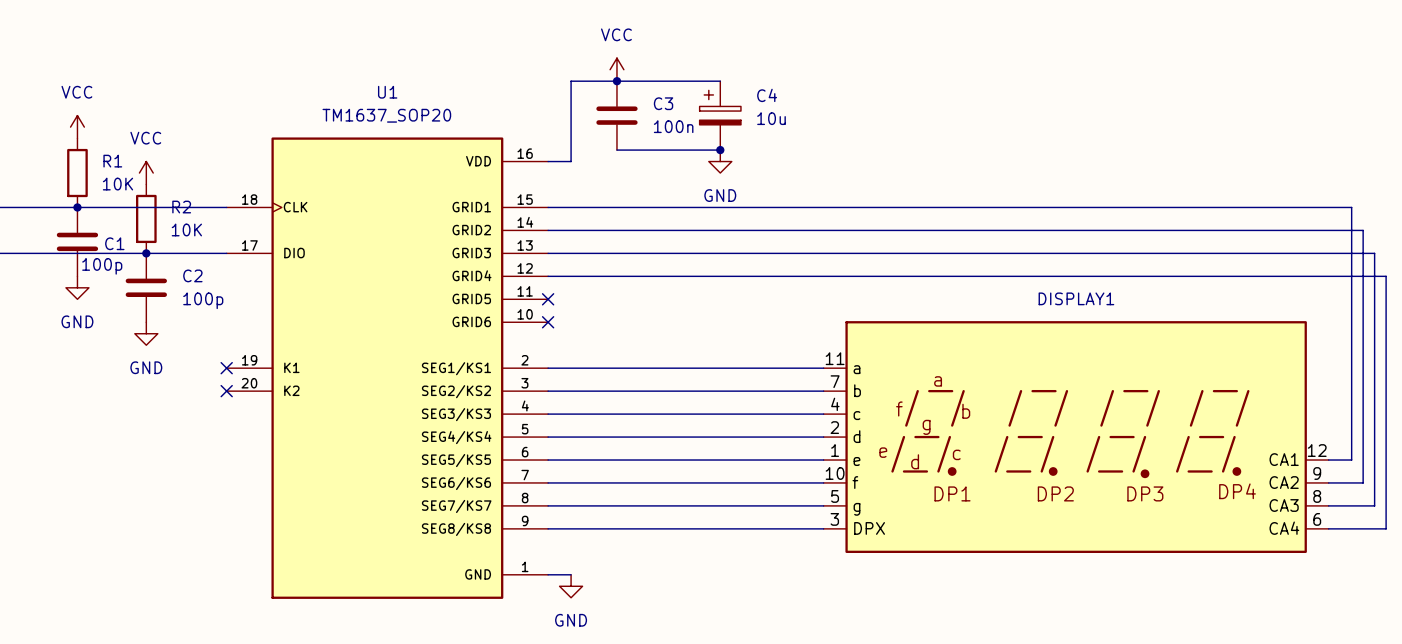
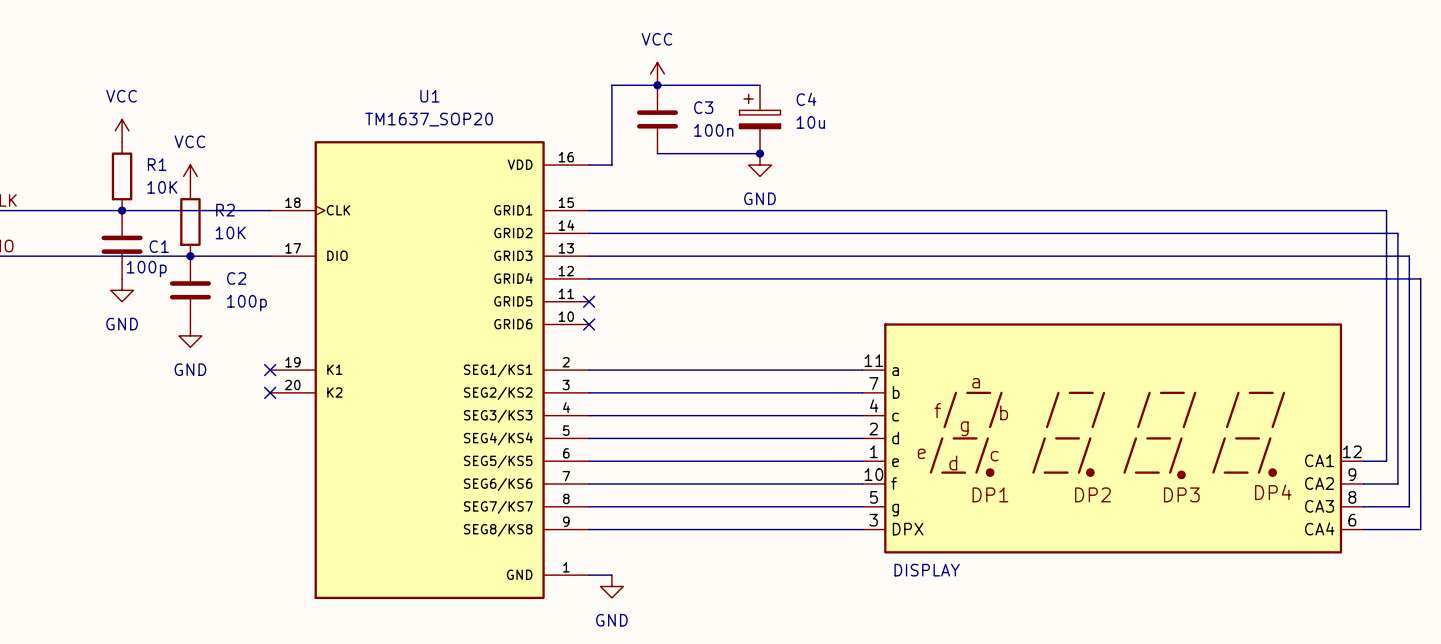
DISPLAY1 name: DISPLAY1 (1076, 298) -> none
DISPLAY1 text: none -> DISPLAY (927, 570)

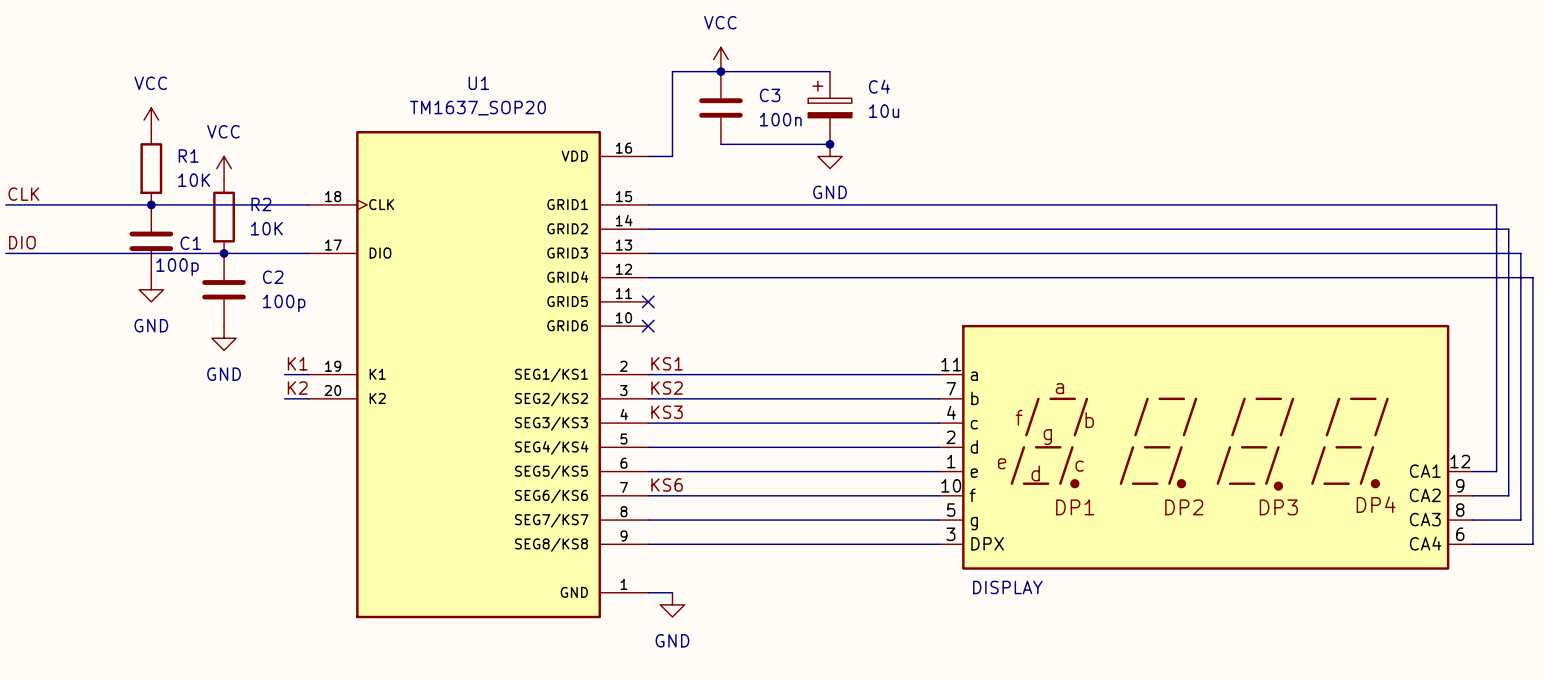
label: none -> K1 (297, 363)
label: none -> KS1 (667, 363)
wire: none -> (284, 374) (308, 374)
no-connect mark: (270, 370) -> none
label: none -> K2 (297, 388)
label: none -> KS2 (667, 388)
wire: none -> (284, 398) (308, 398)
no-connect mark: (270, 392) -> none
label: none -> KS3 (667, 412)
label: none -> KS6 (667, 484)

